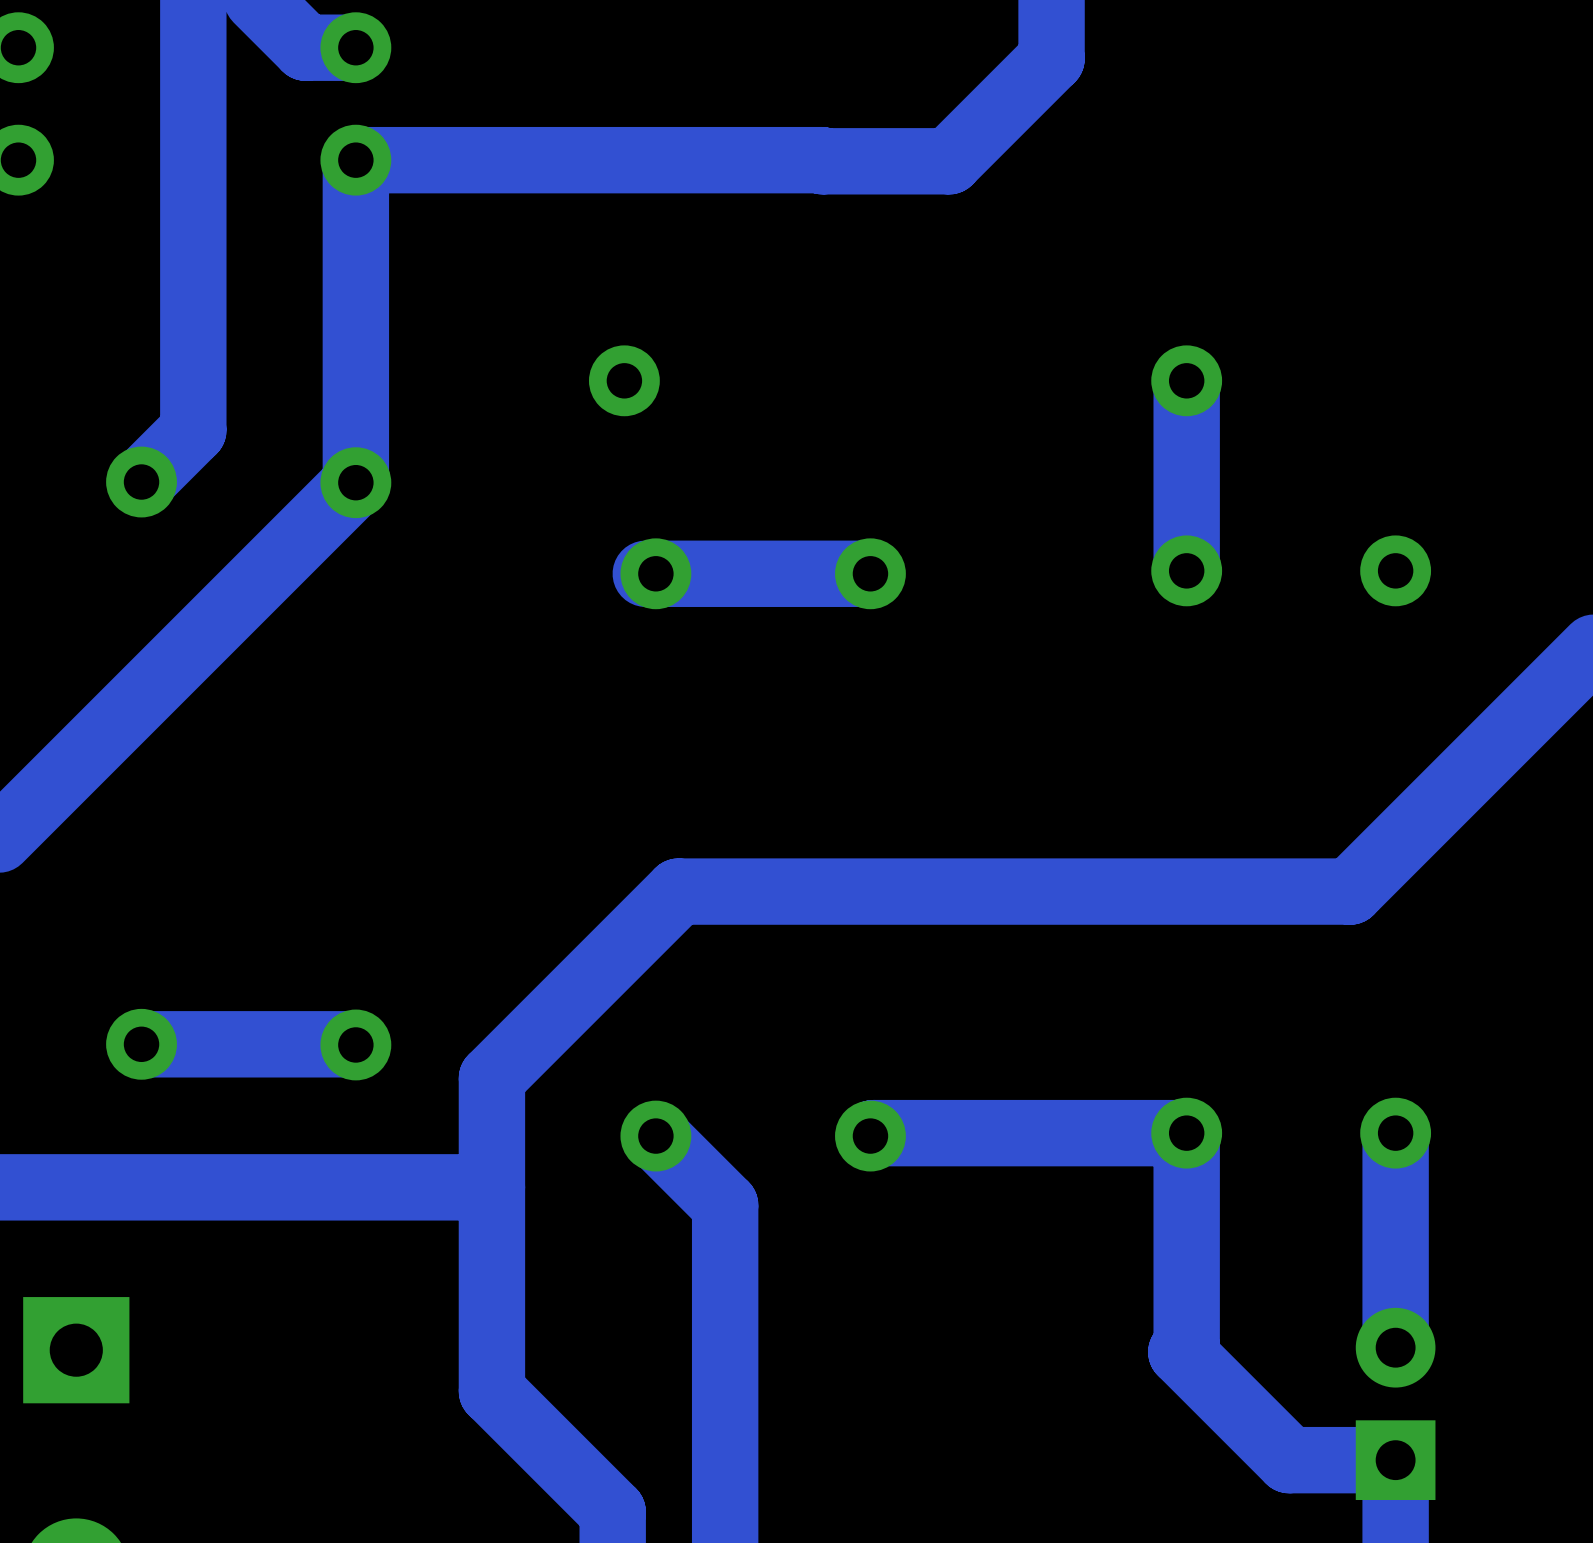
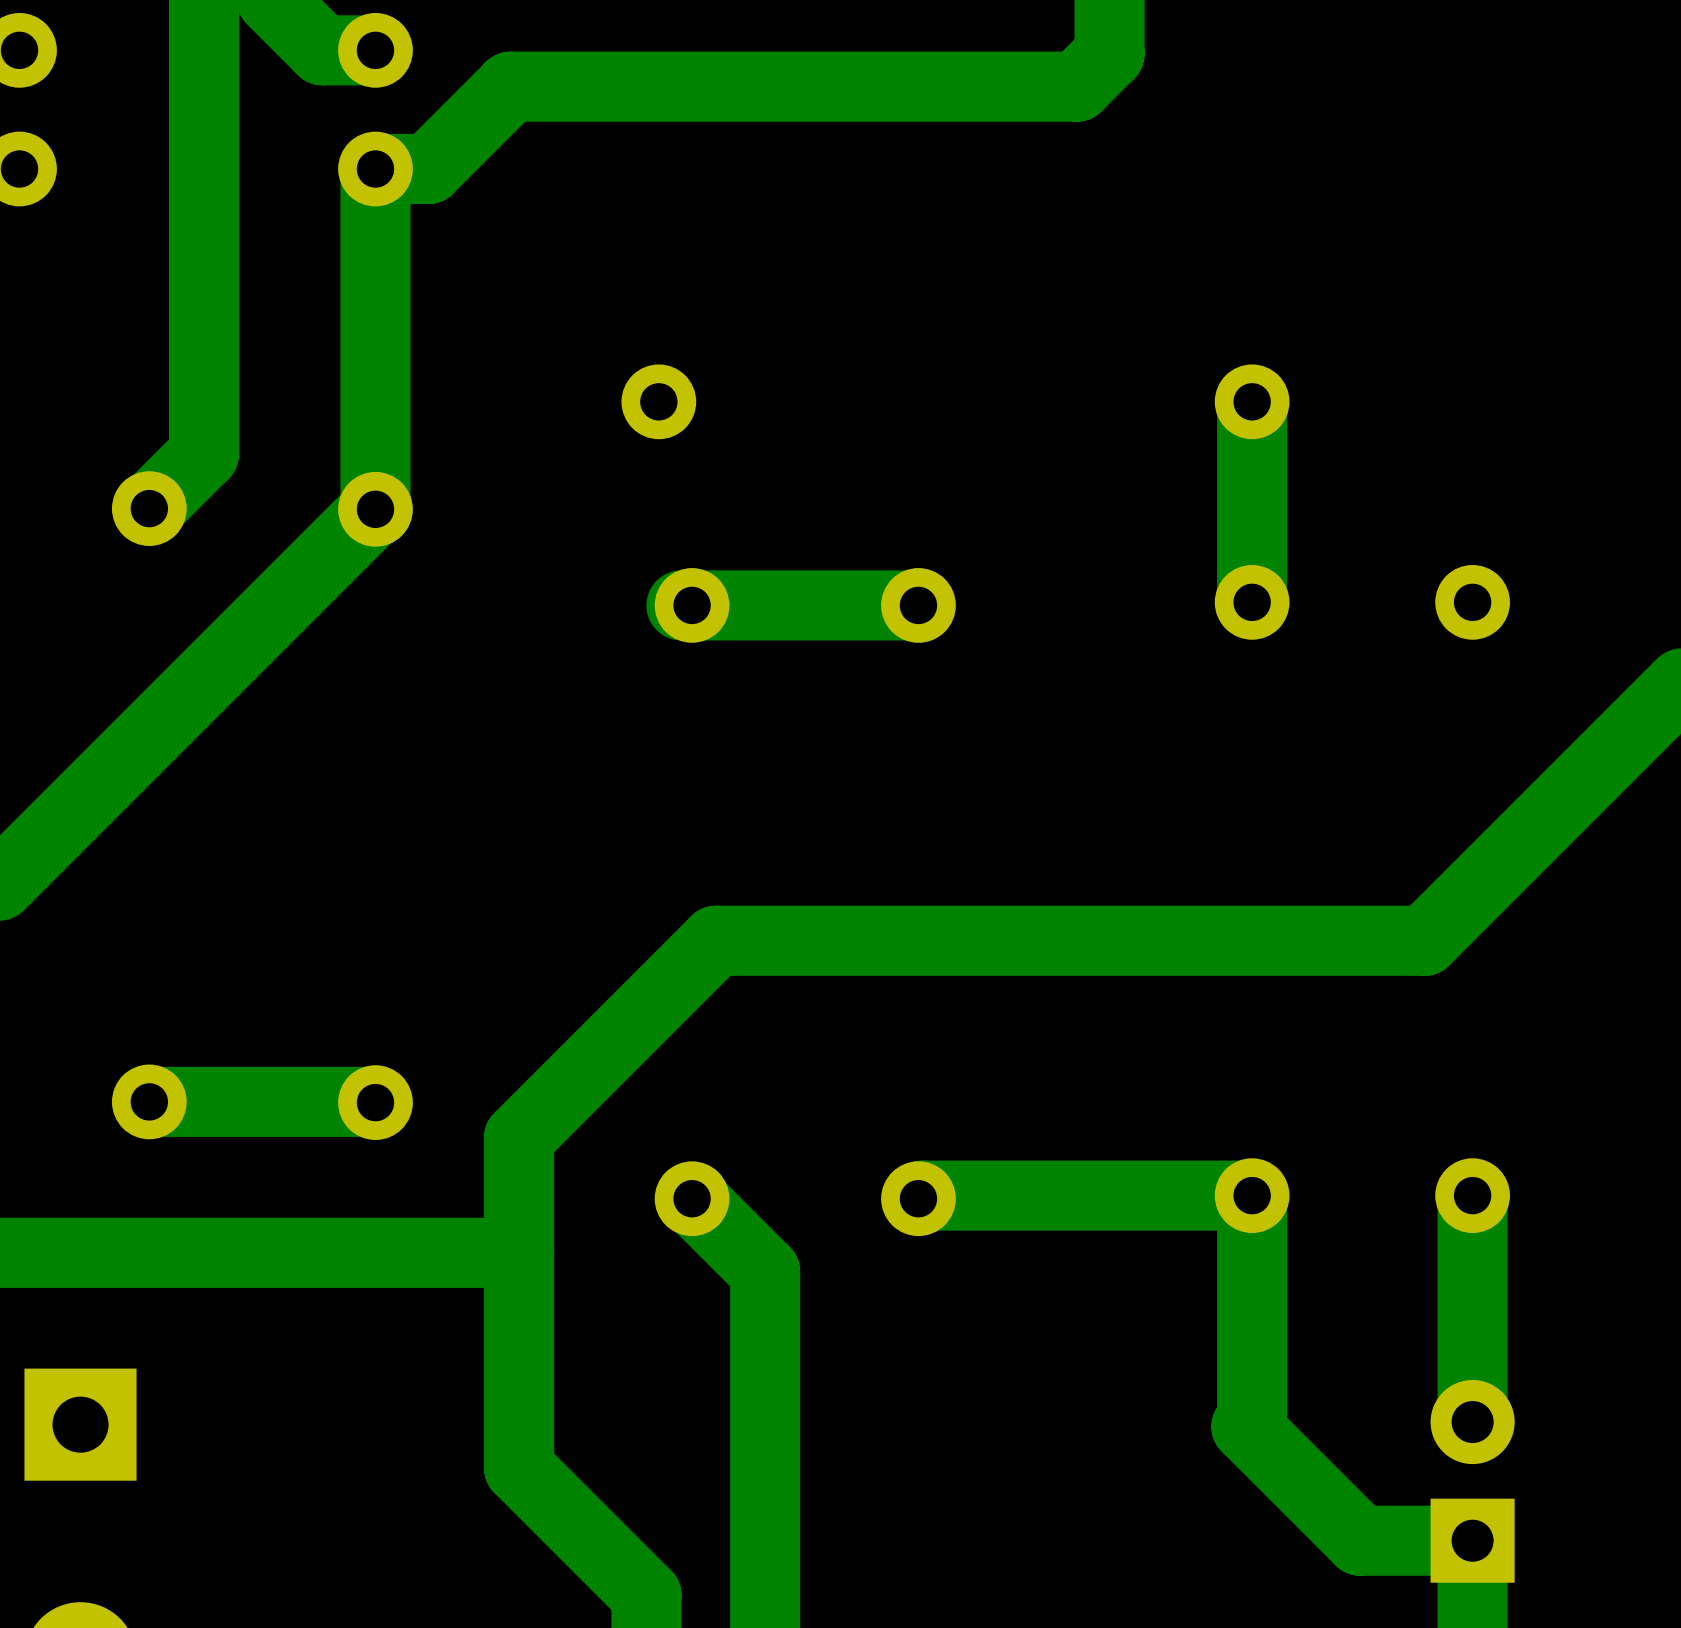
track: (1051, 51) (1051, 58) (948, 161) (405, 160) -> (1109, 53) (1076, 86) (510, 86) (428, 169)

